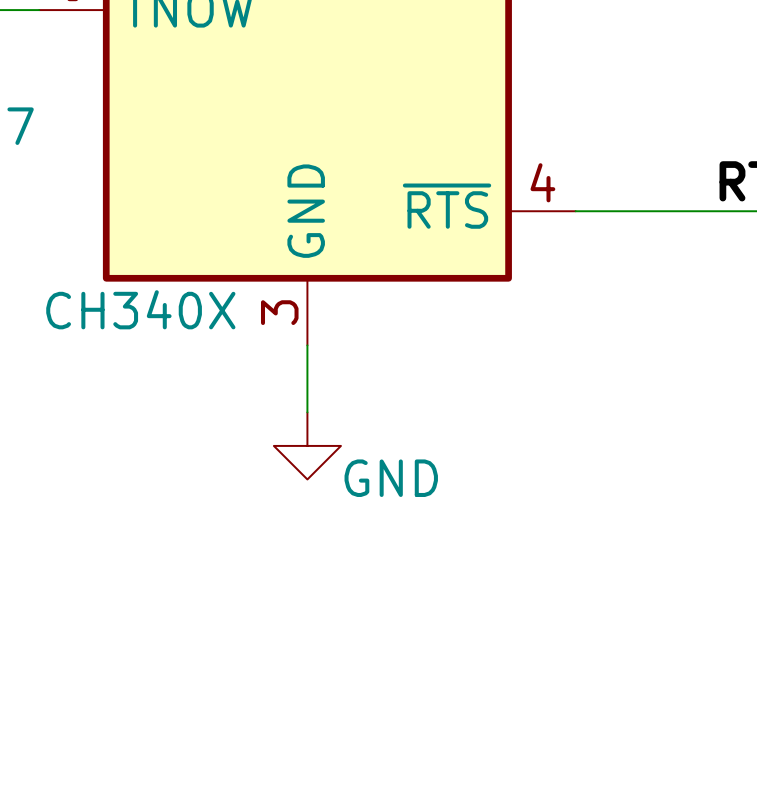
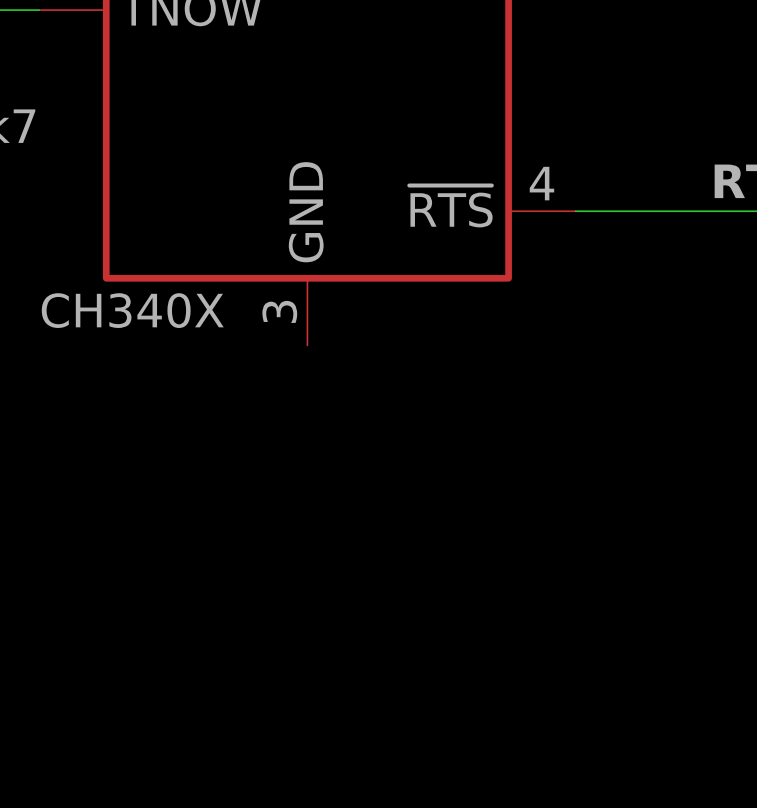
wire: (307, 345) (307, 412) -> none
power symbol: GND (307, 445) -> none

